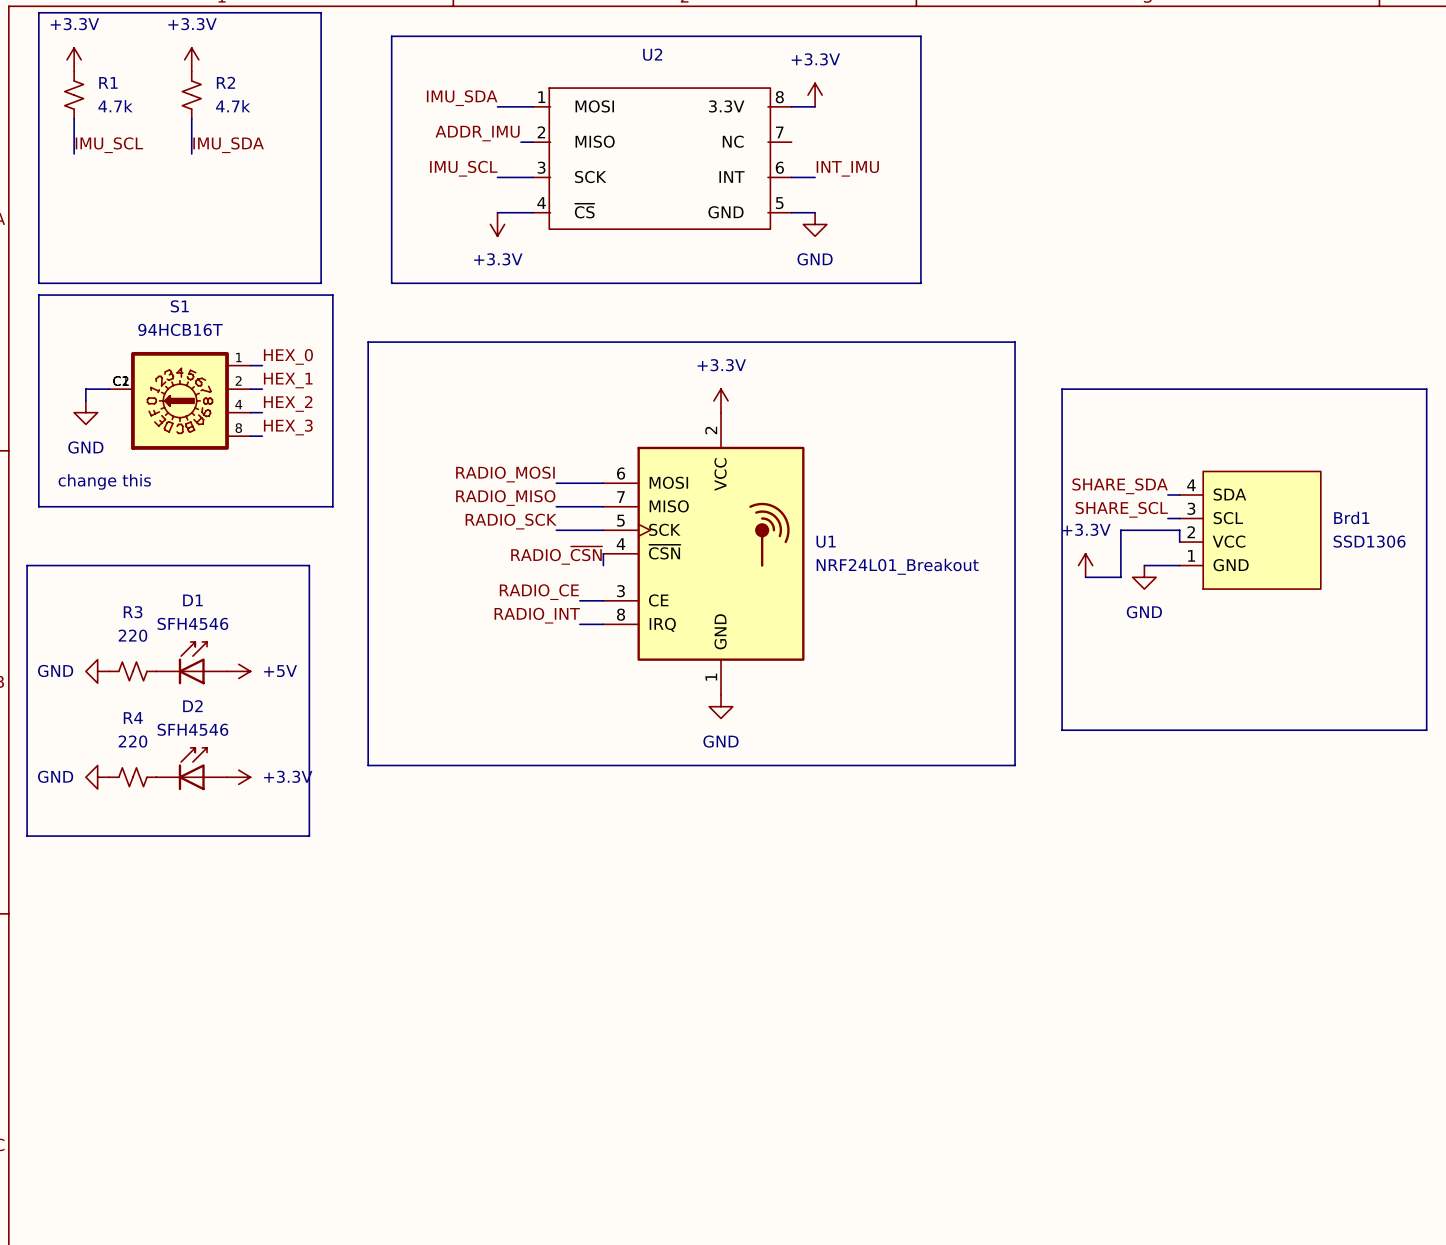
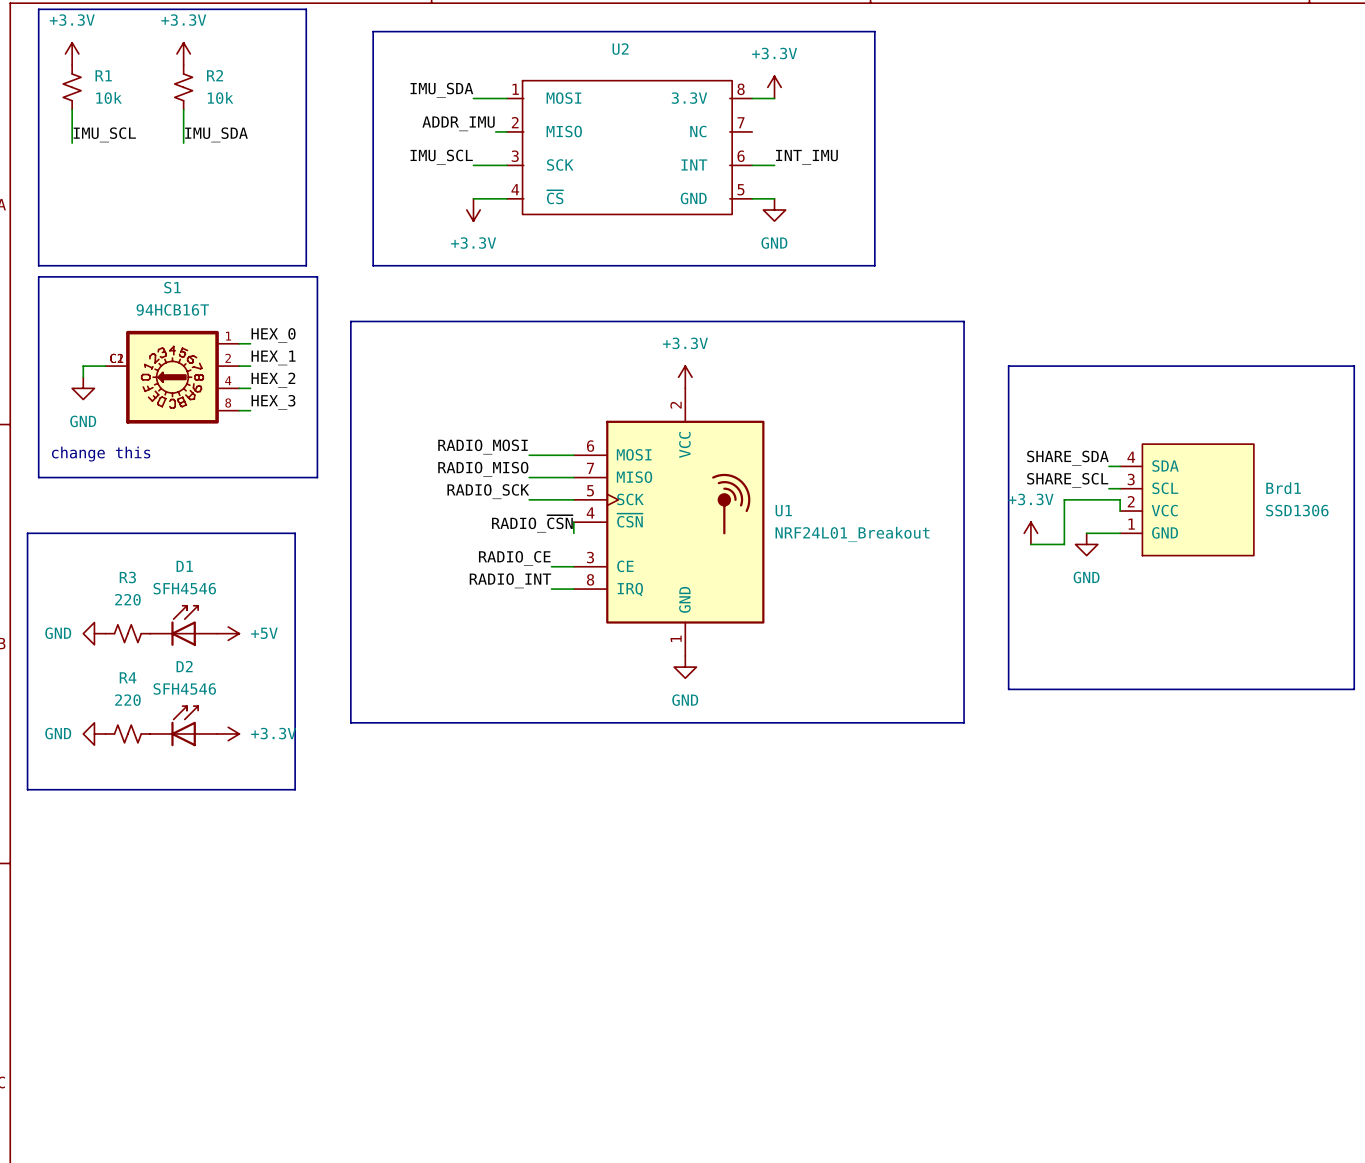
R1 value: 4.7k (115, 106) -> 10k (109, 97)
R2 value: 4.7k (233, 106) -> 10k (220, 97)

